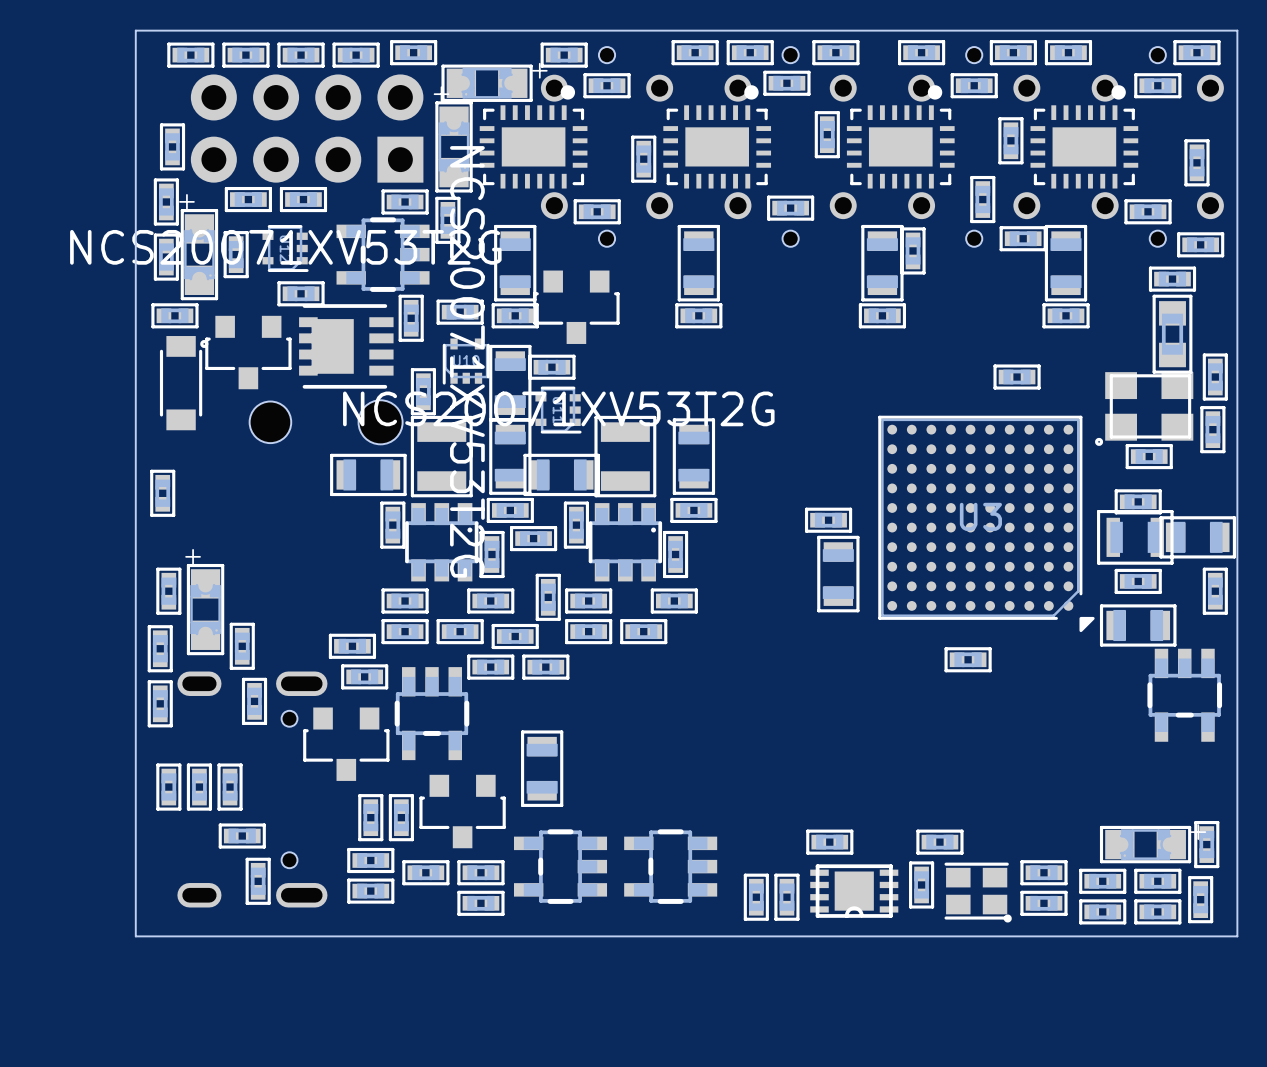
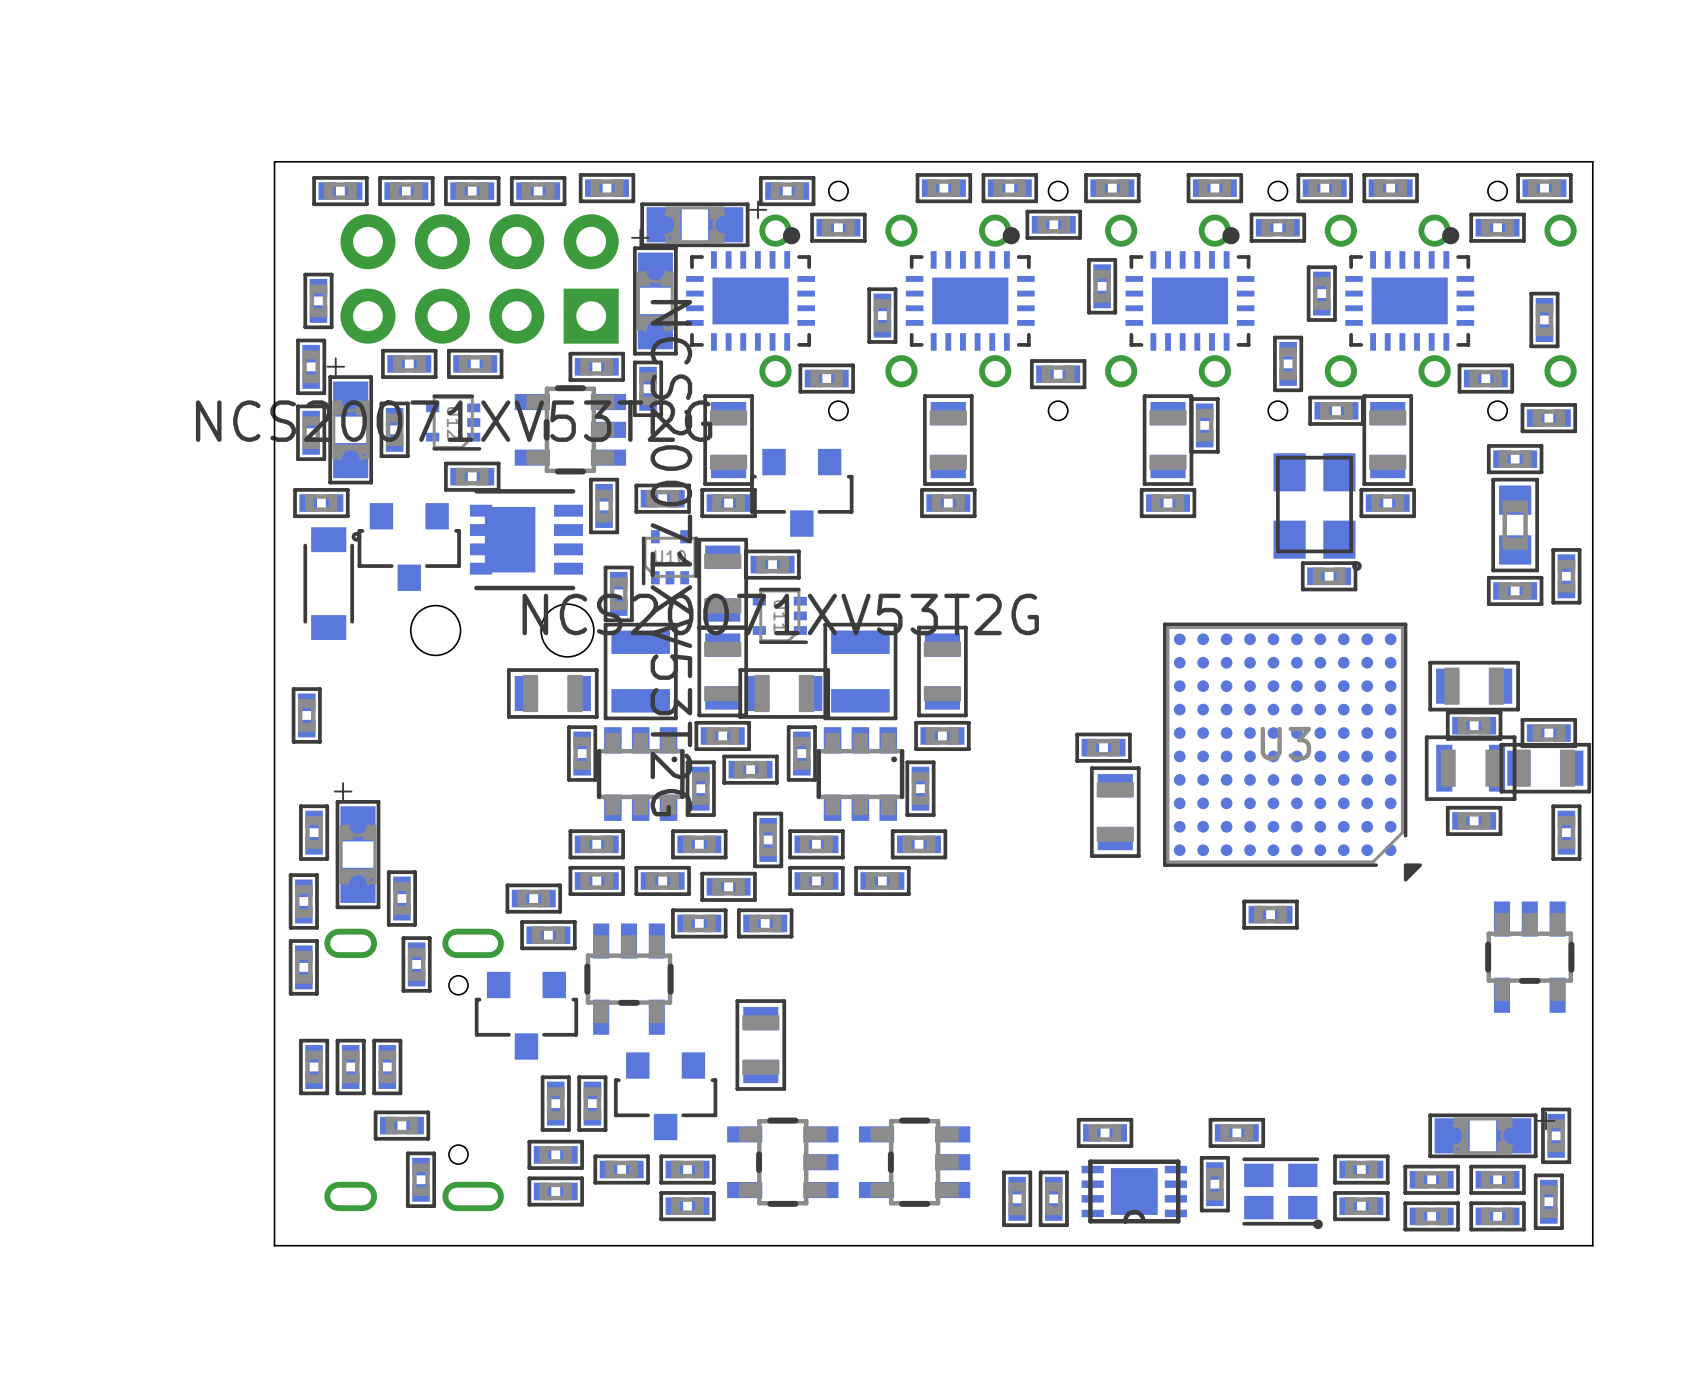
part: none -> (1515, 590)
part rotation: 0° (1144, 409) -> 90° counterclockwise (1317, 512)
part position: (1144, 409) -> (1317, 512)
part: (1212, 429) -> none
part footprint: [1125, 444, 1173, 470] -> [1428, 660, 1520, 712]
part: none -> (1548, 733)
part: (1138, 625) -> none

